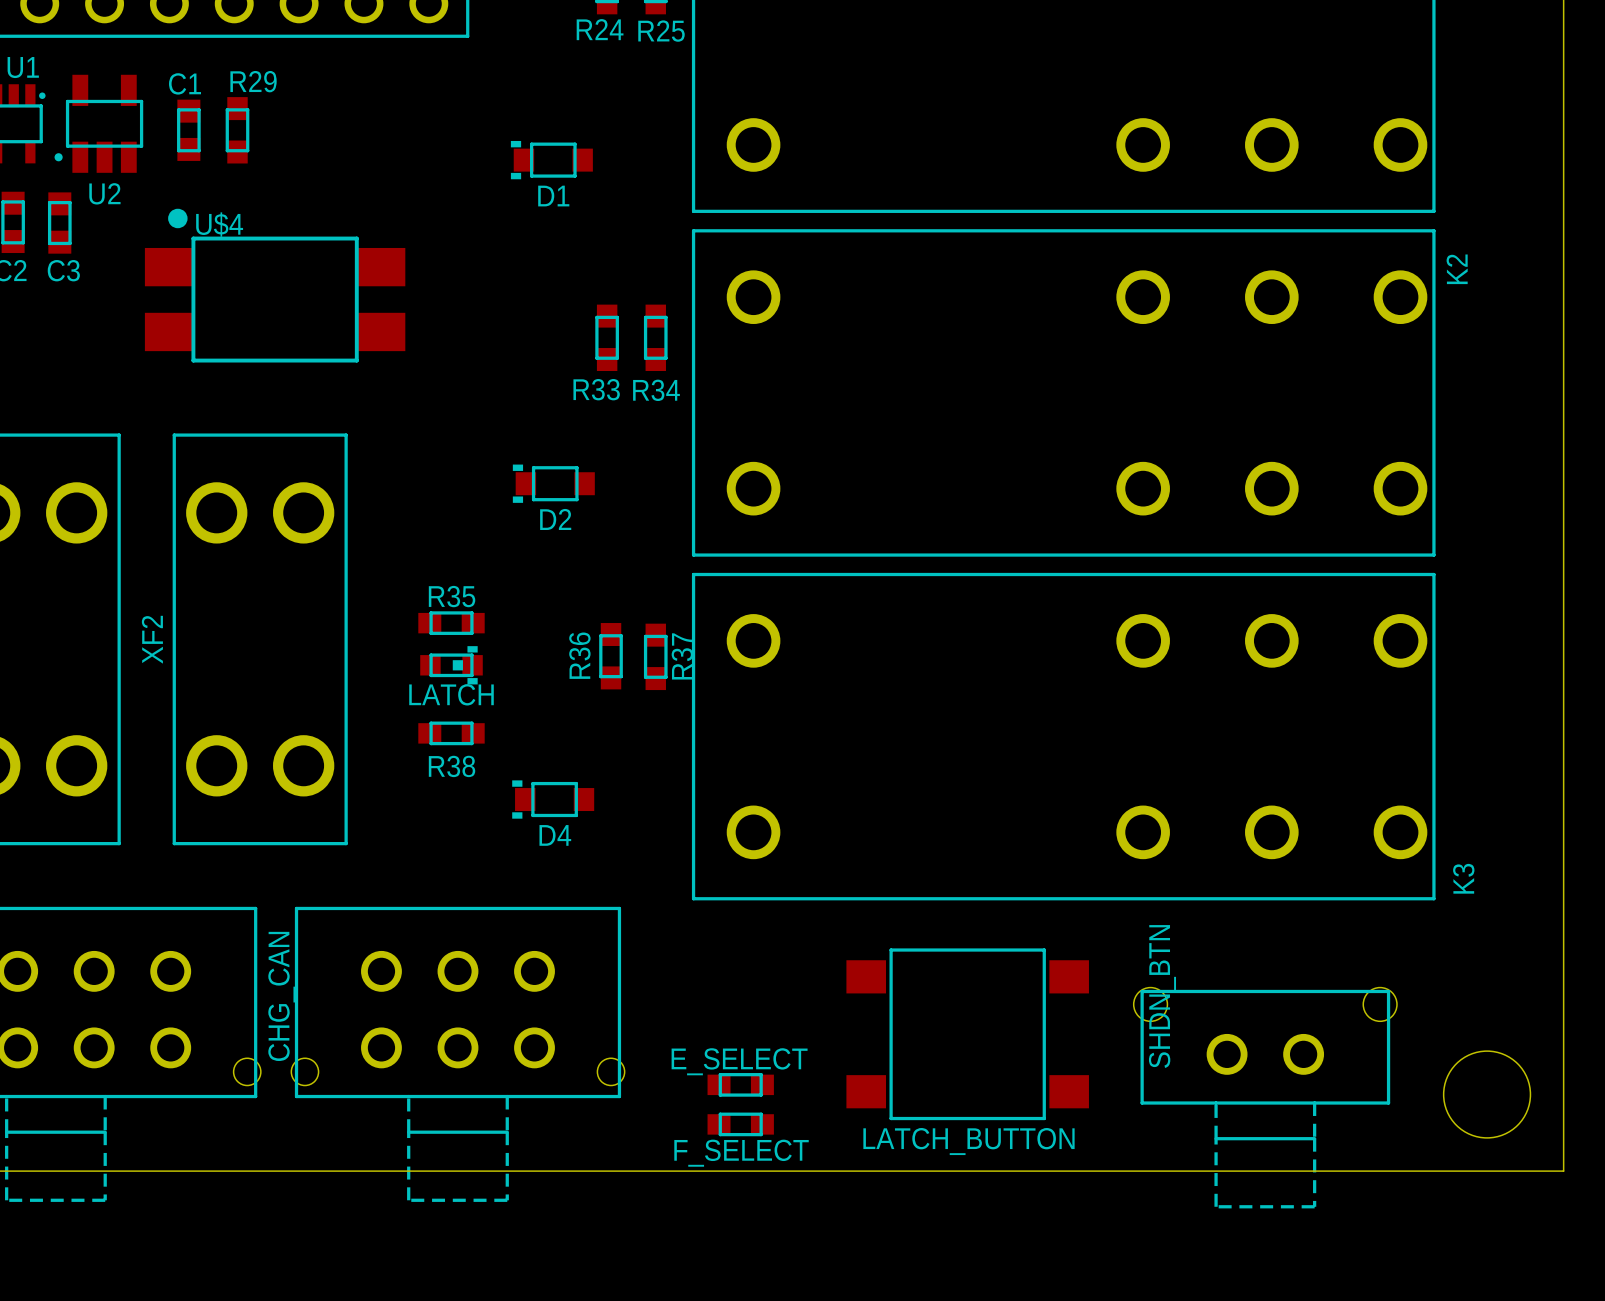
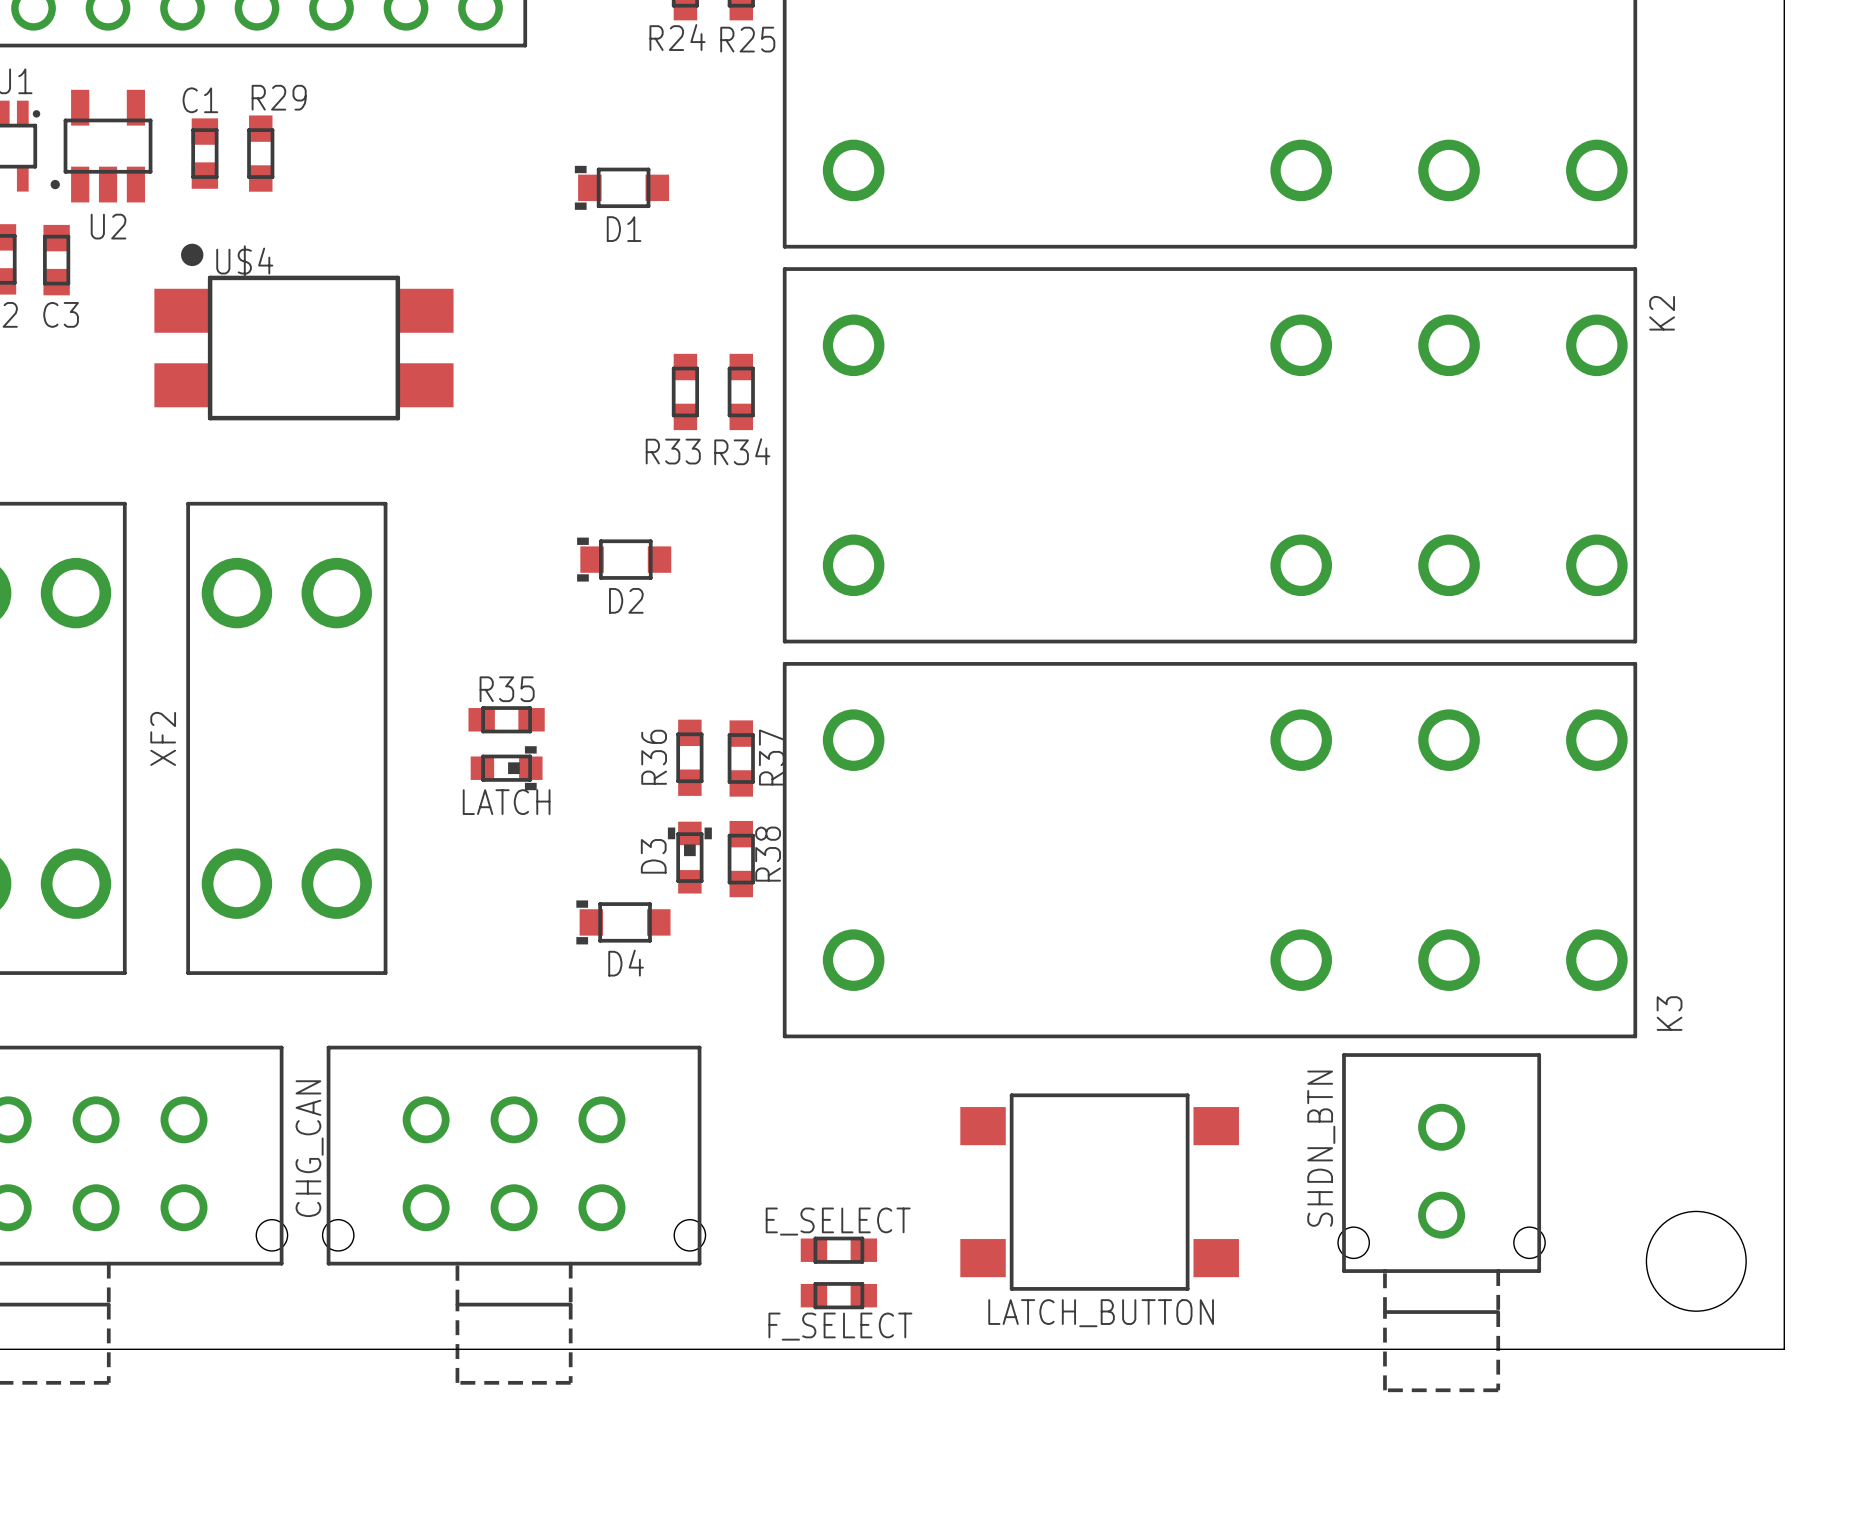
R38 rotation: 0° (451, 733) -> 90° clockwise (741, 859)
R38 position: (451, 733) -> (741, 859)
D3: none -> (689, 857)
SHDN_BTN: none -> (1441, 1222)
SHDN_BTN: (1265, 1097) -> none

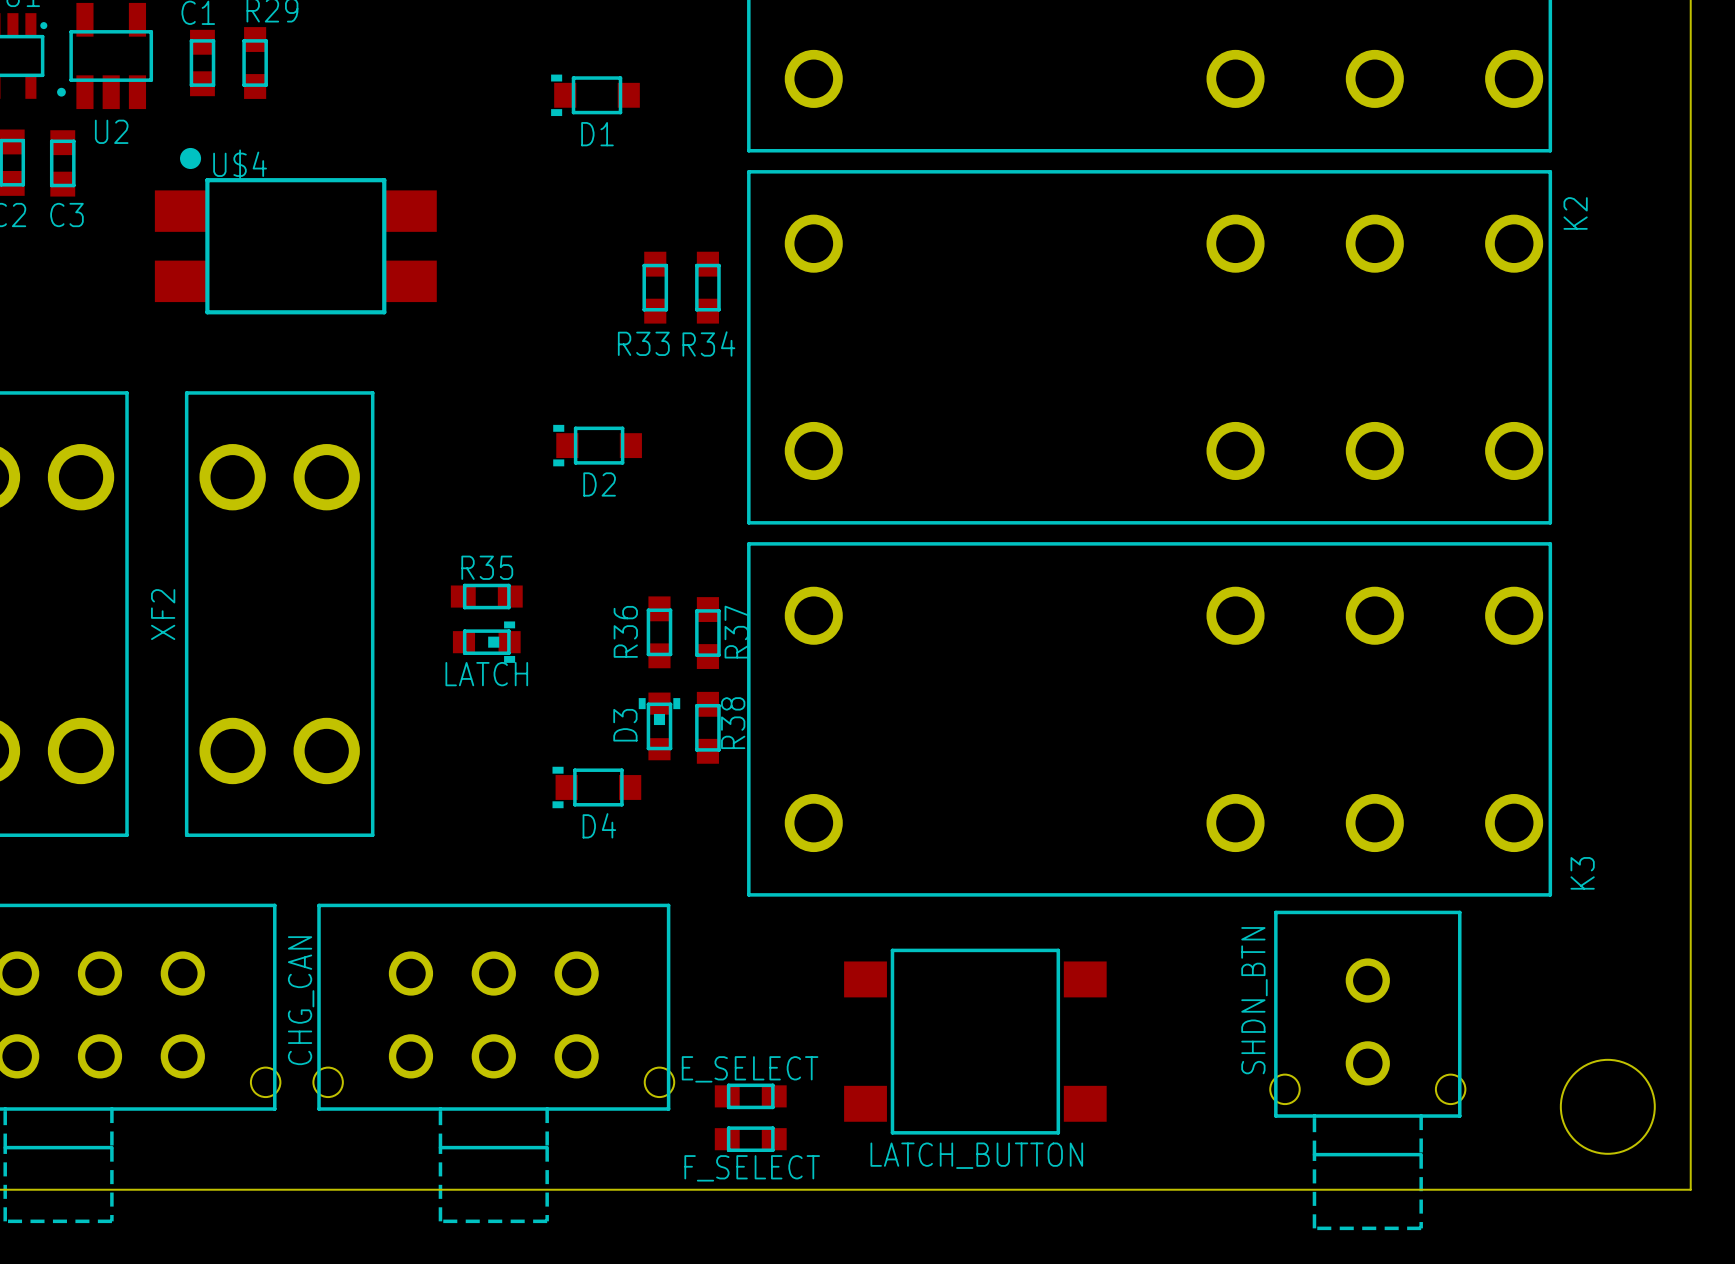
LATCH_BUTTON position: (1099, 1192) -> (975, 1041)
E_SELECT position: (838, 1250) -> (750, 1096)
F_SELECT position: (838, 1295) -> (750, 1139)

